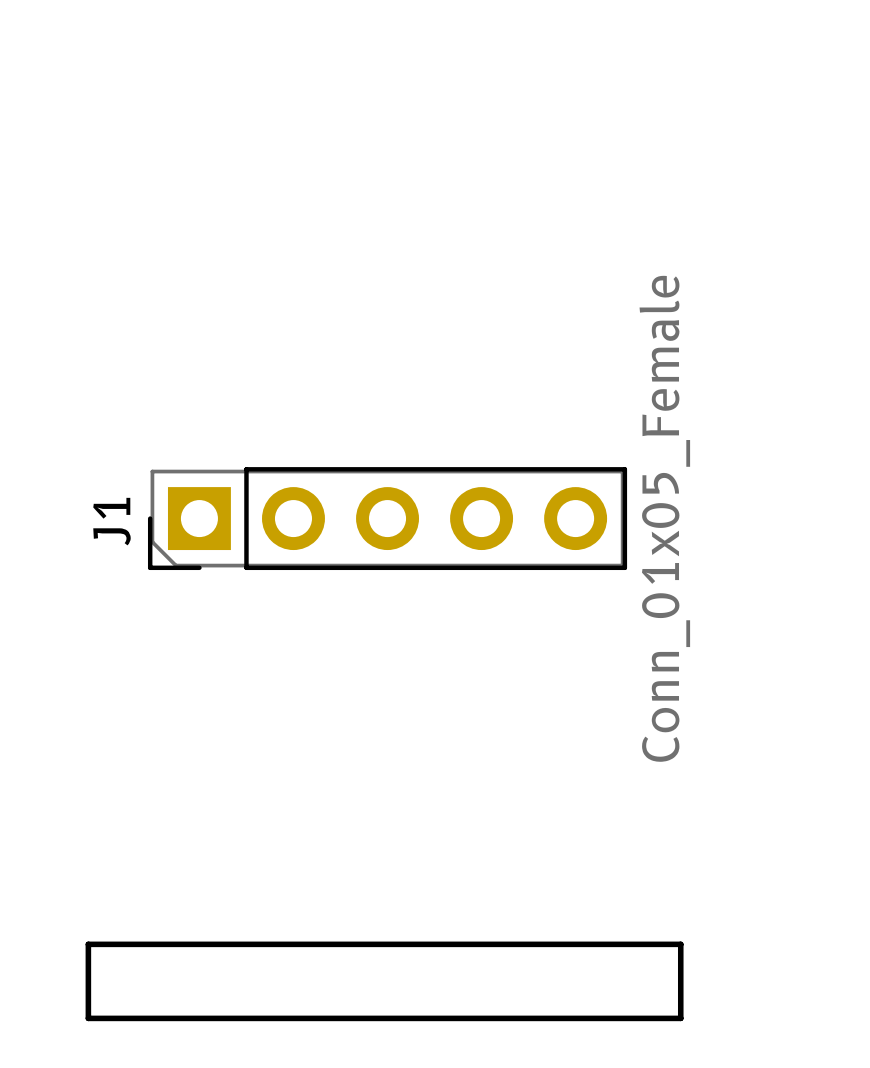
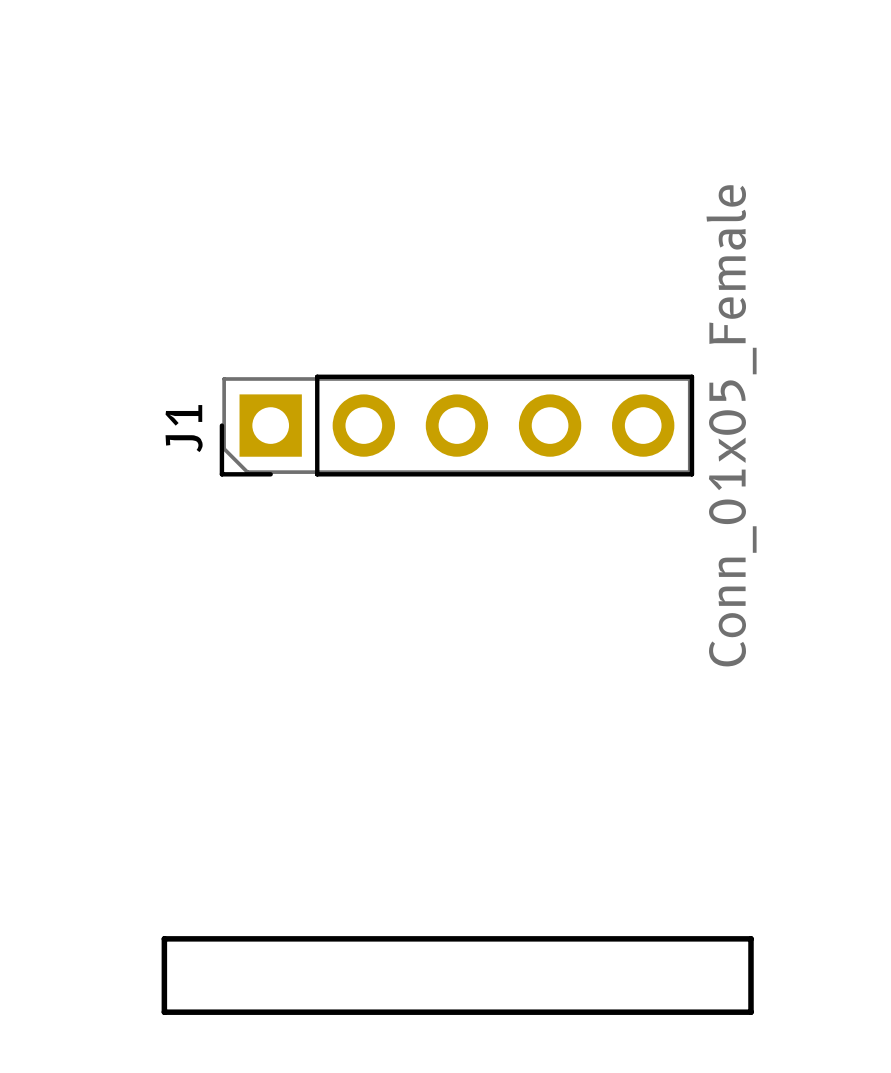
J1 position: (387, 518) -> (456, 425)

